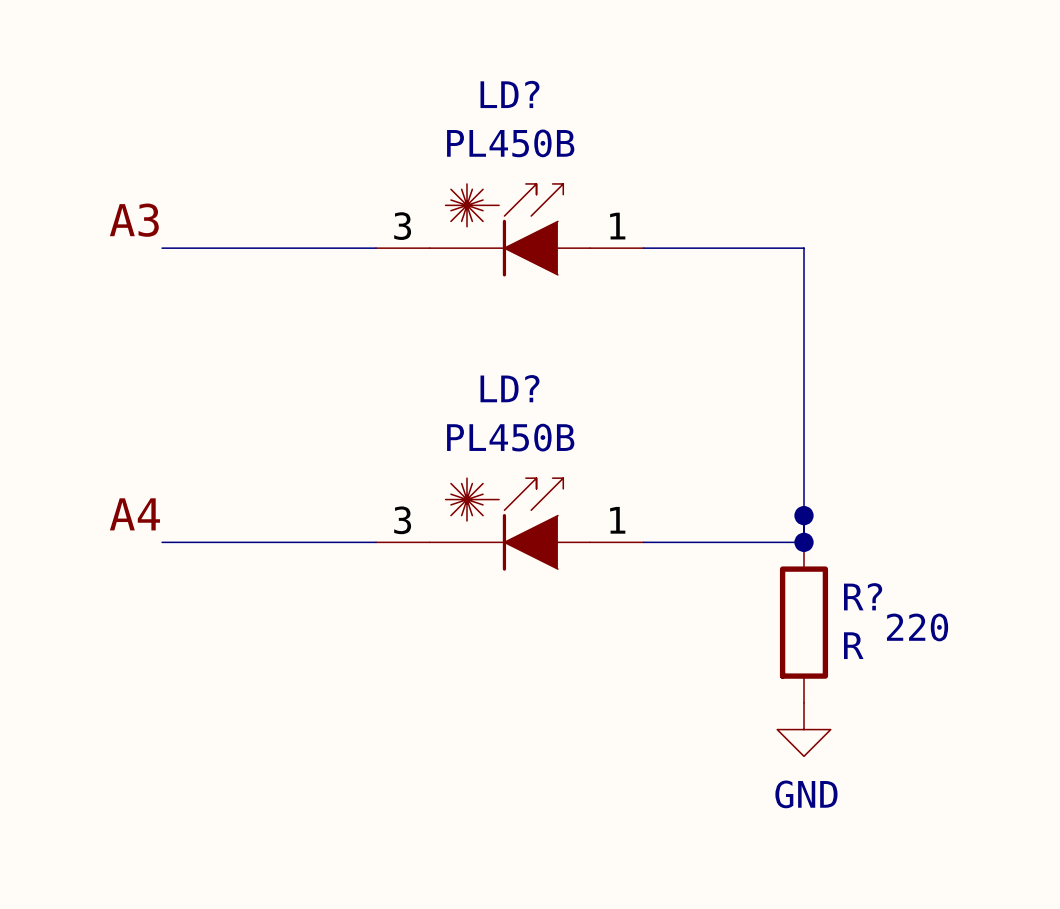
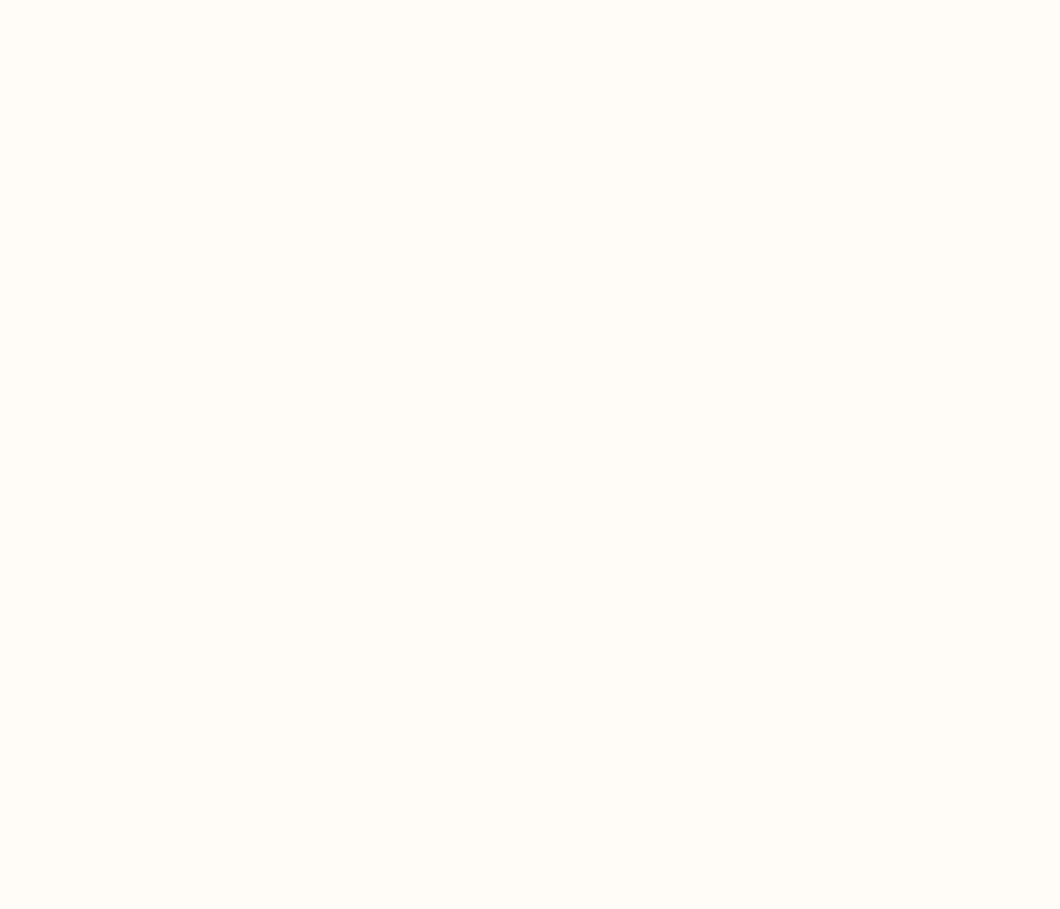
label: A3 (134, 220) -> none
LD?: PL450B (509, 230) -> none
wire: (162, 248) (376, 248) -> none
wire: (643, 248) (803, 248) (803, 542) (643, 542) -> none
label: A4 (134, 514) -> none
junction: (803, 515) -> none
LD?: PL450B (509, 524) -> none
wire: (162, 542) (376, 542) -> none
junction: (803, 542) -> none
R?: R (803, 622) -> none
text: 220 (917, 627) -> none
power symbol: GND (803, 729) -> none

